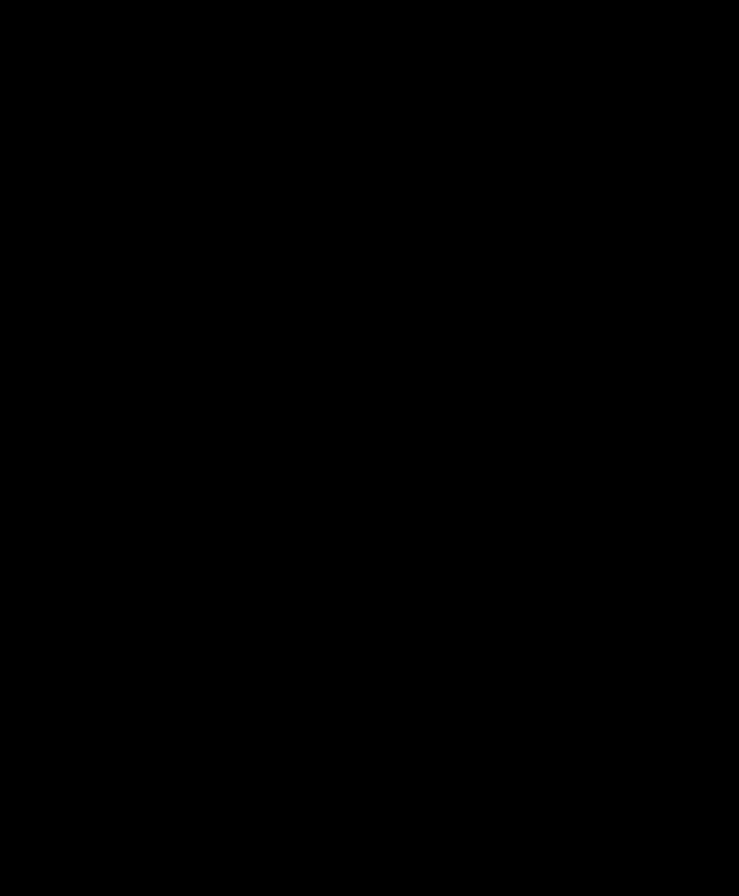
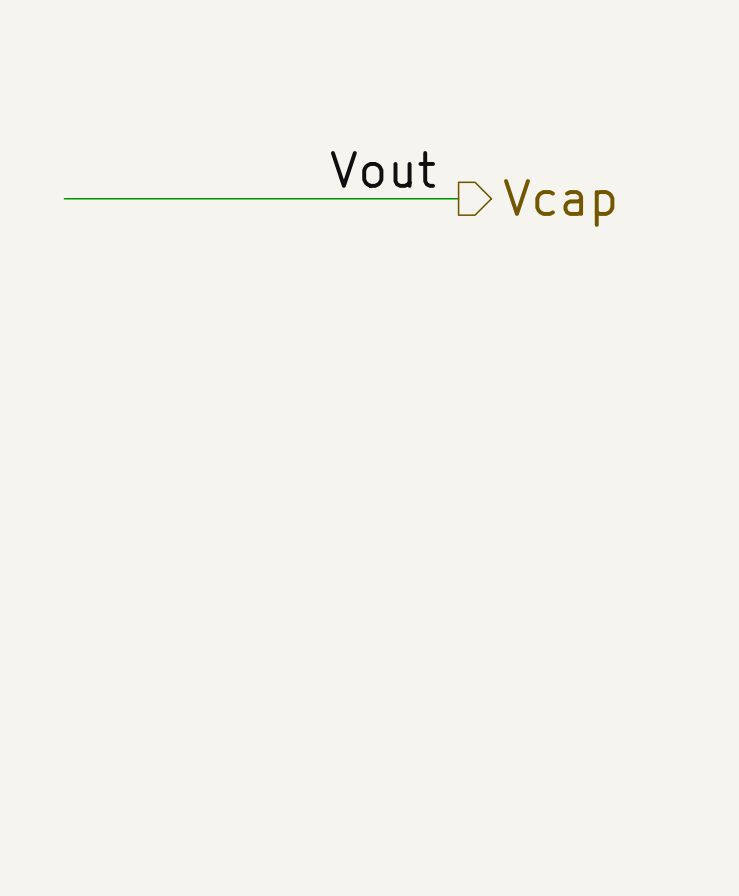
label: none -> Vout (382, 169)
wire: none -> (64, 198) (458, 198)
hierarchical label: none -> Vcap (559, 202)

